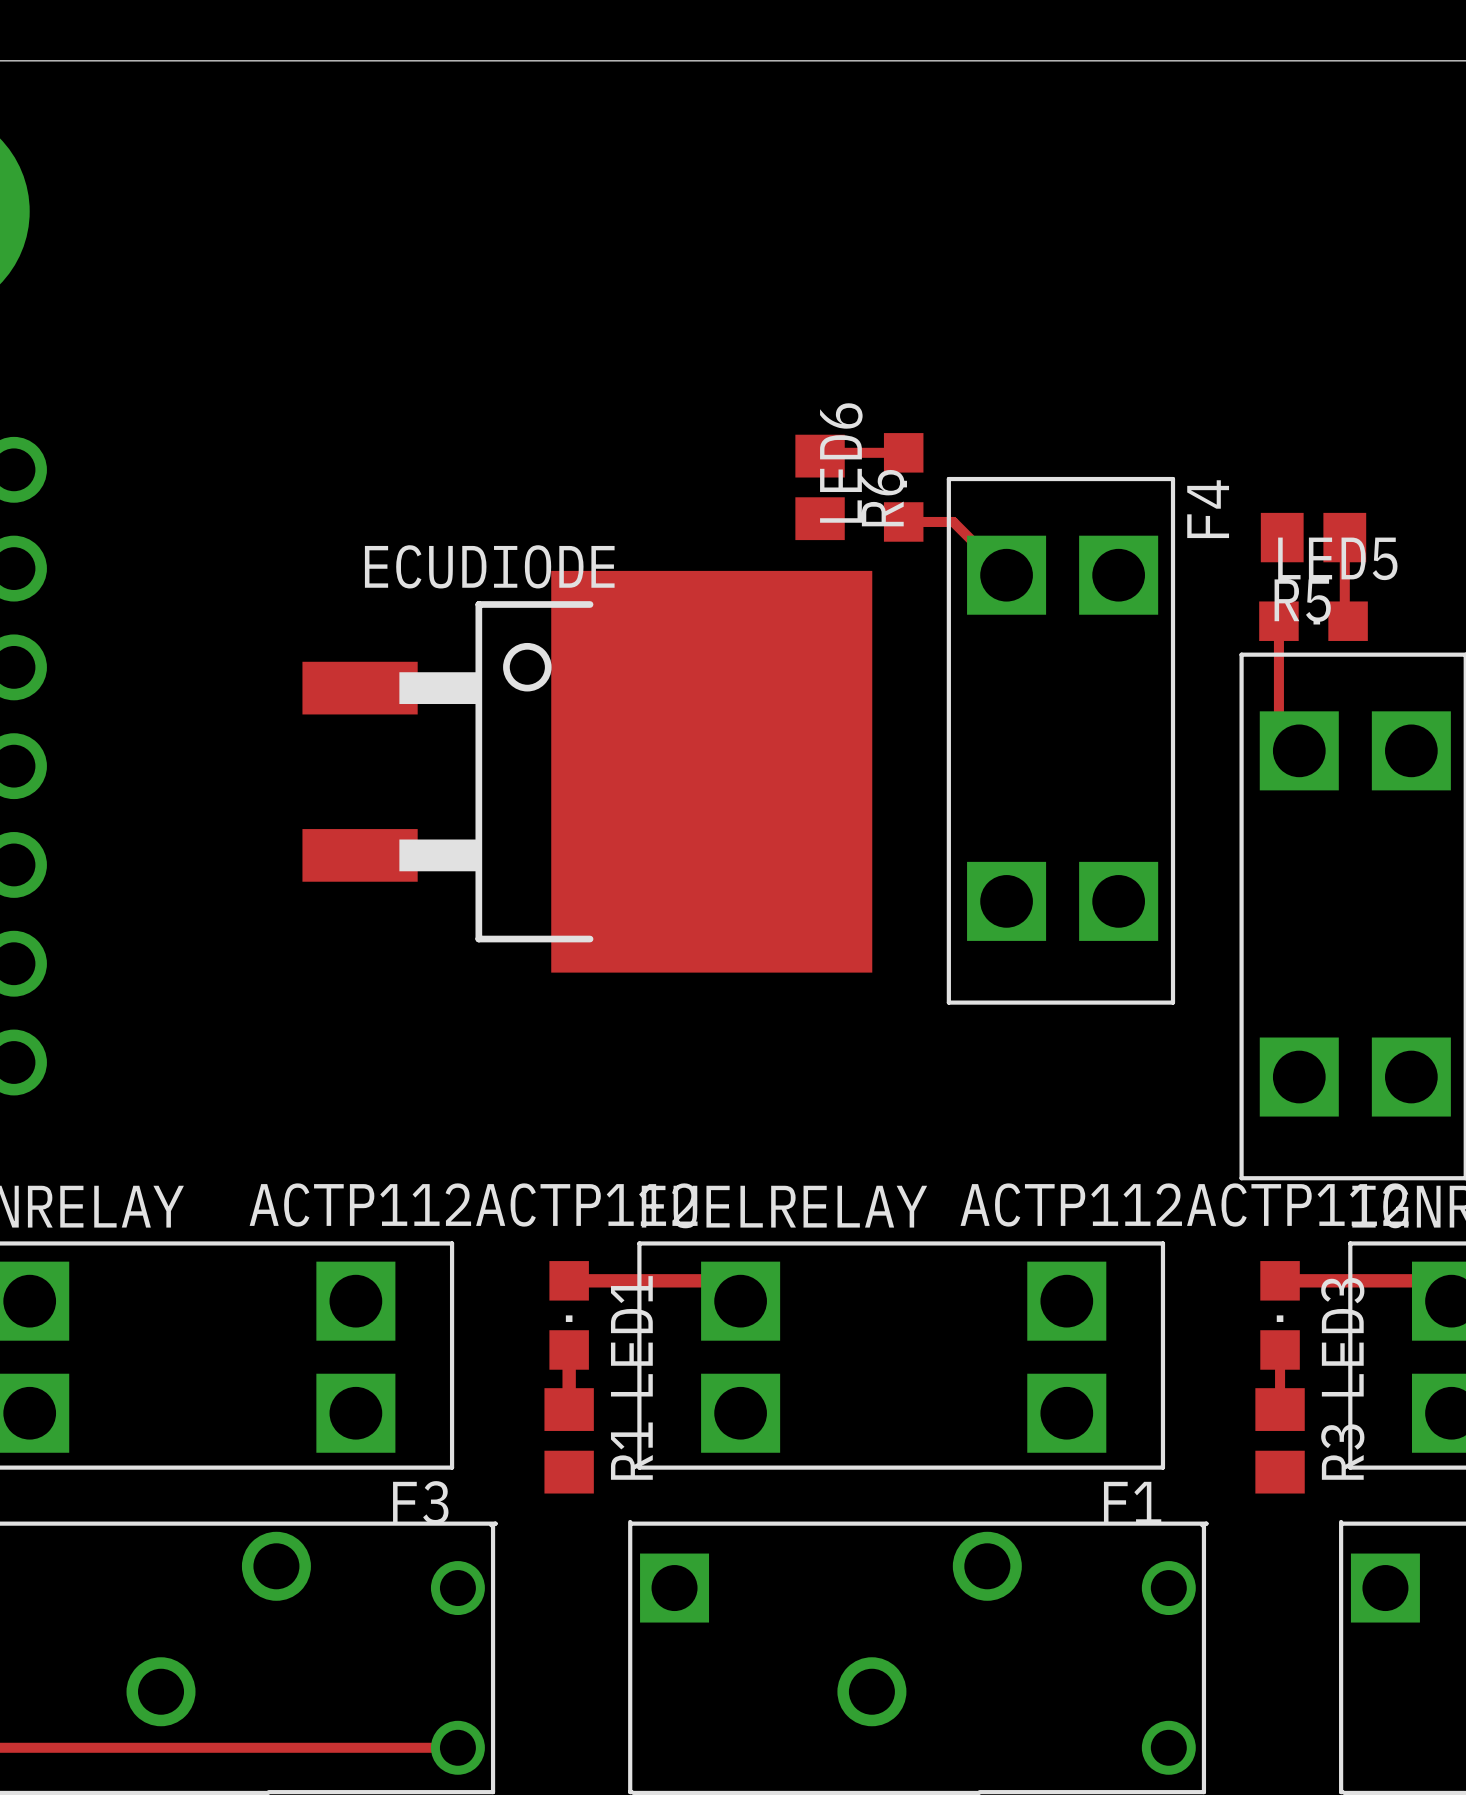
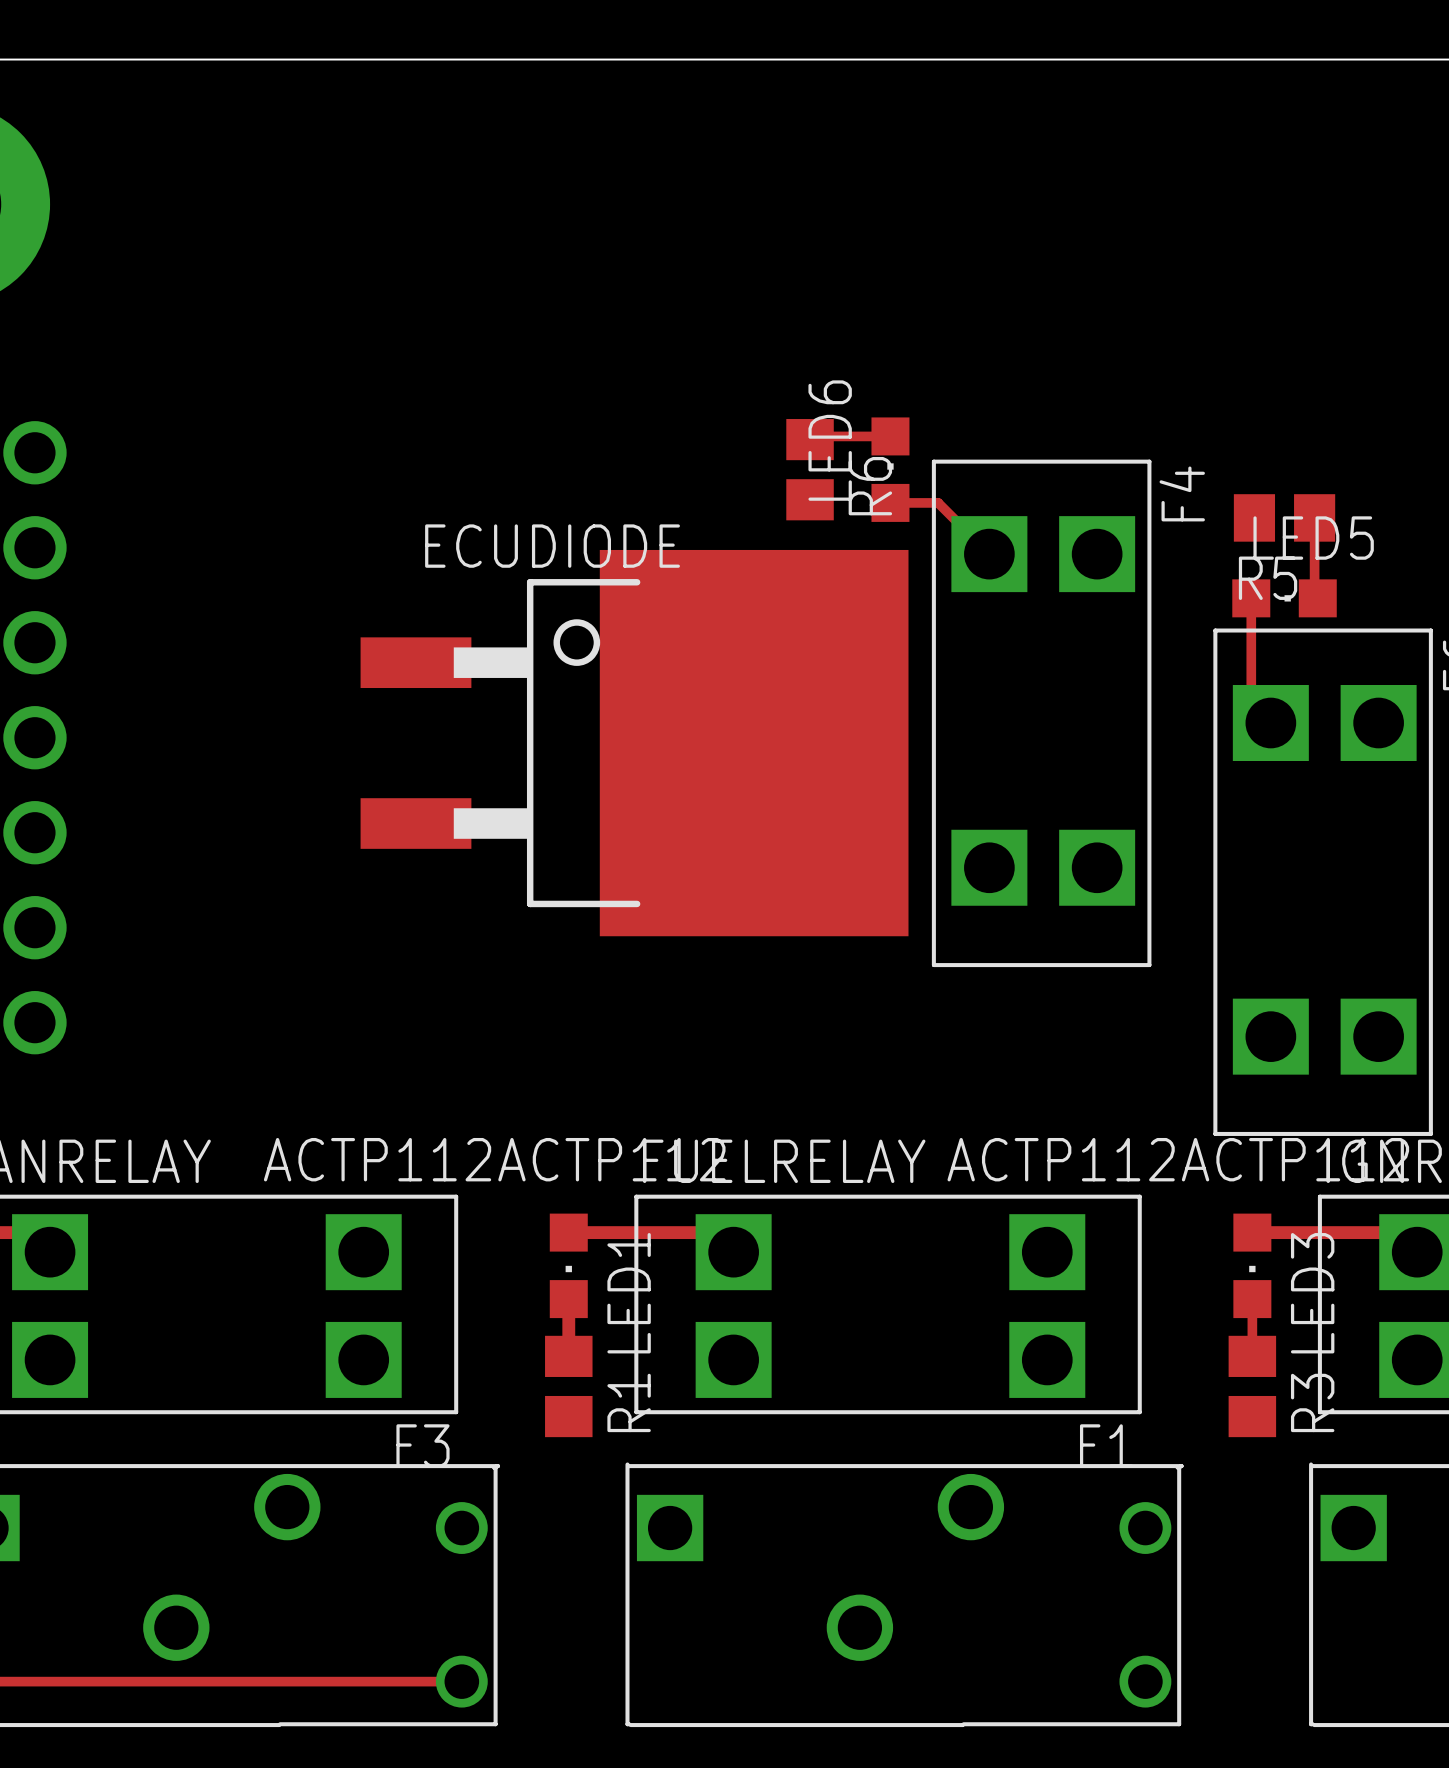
ECUDIODE position: (587, 771) -> (634, 743)

